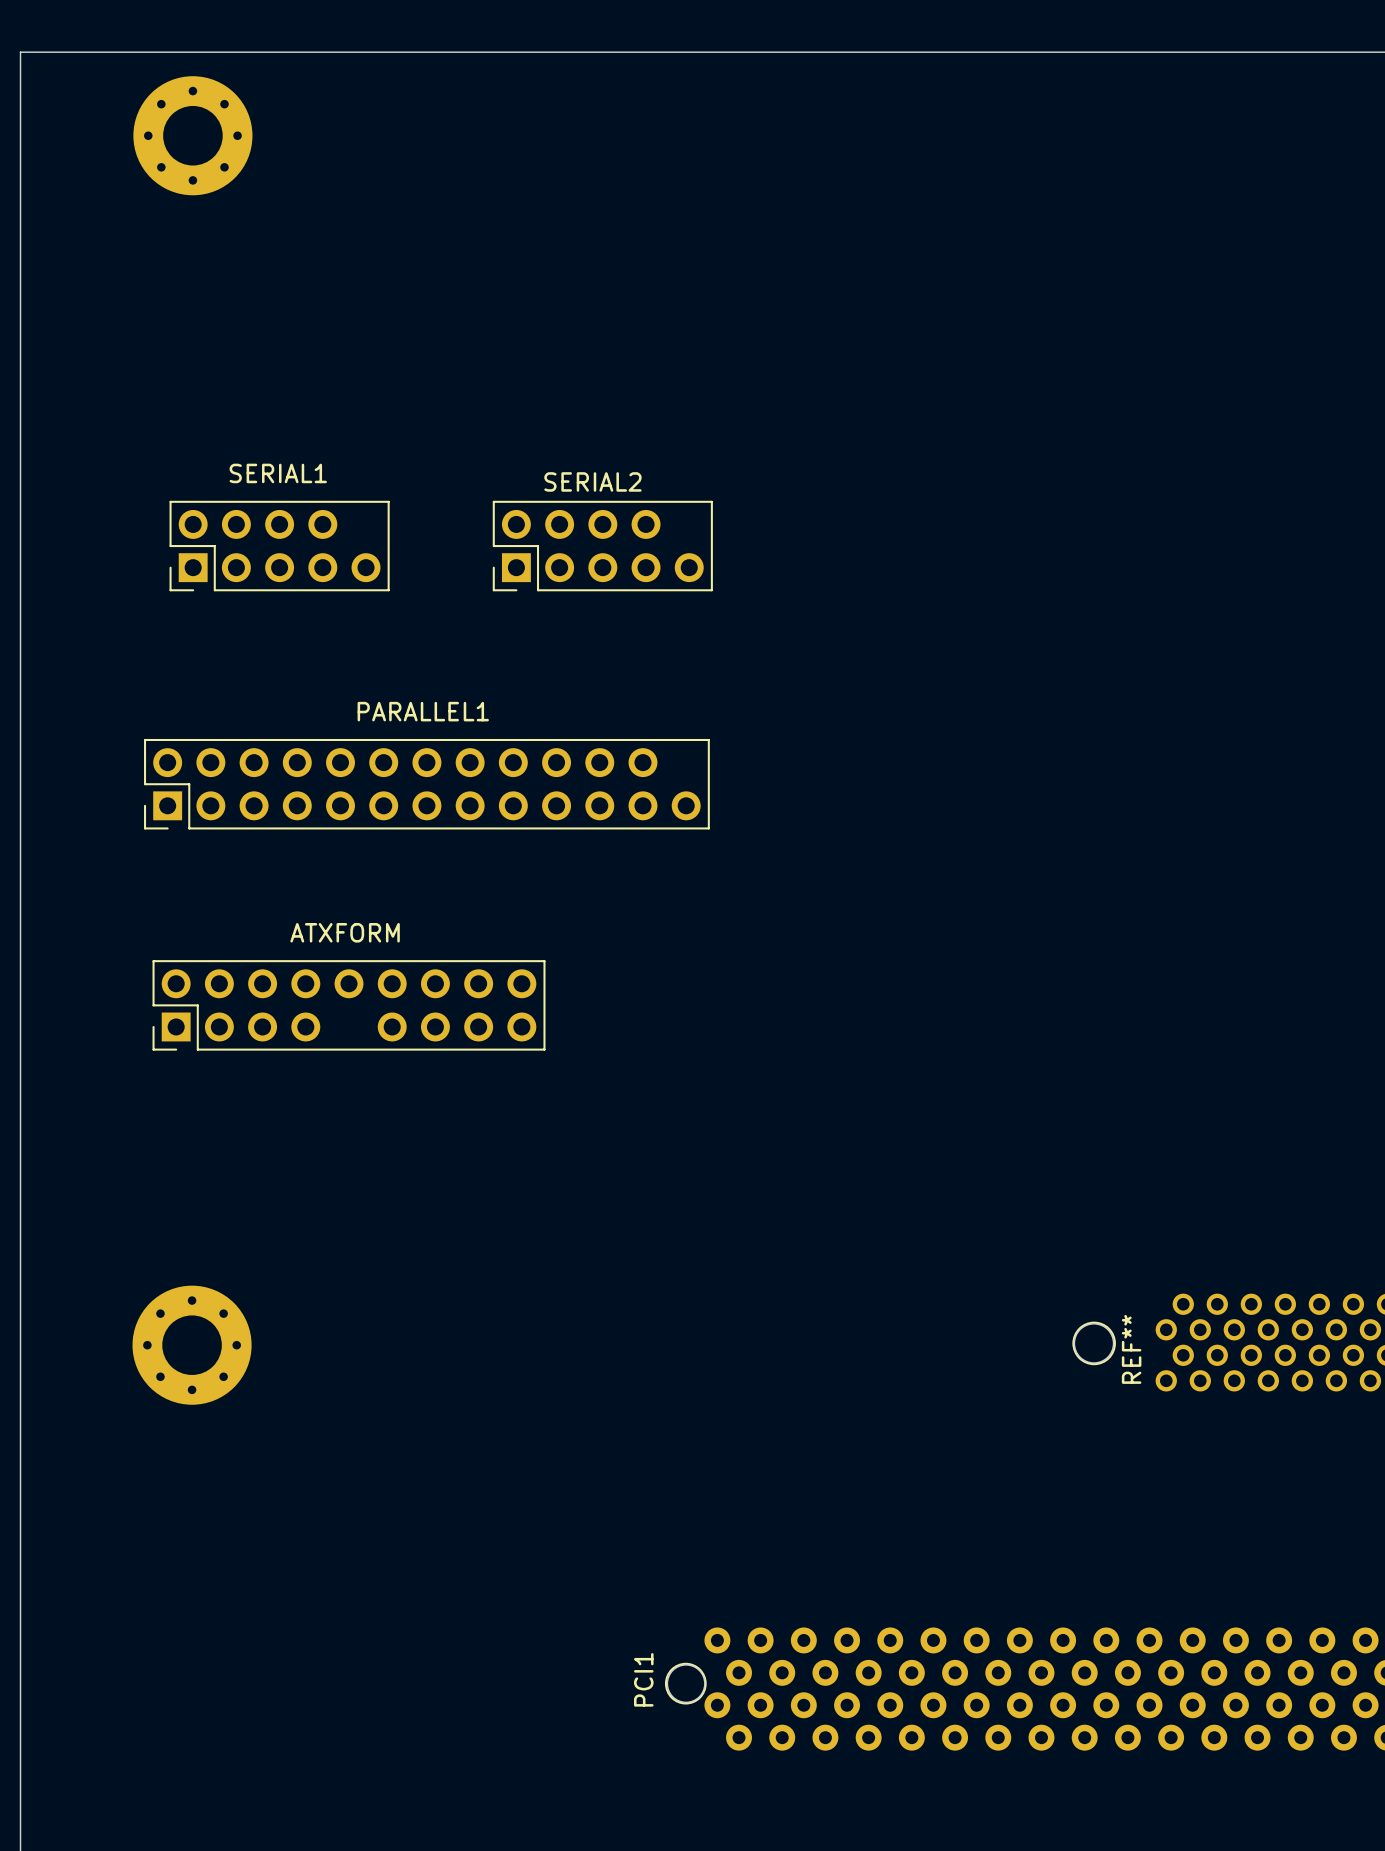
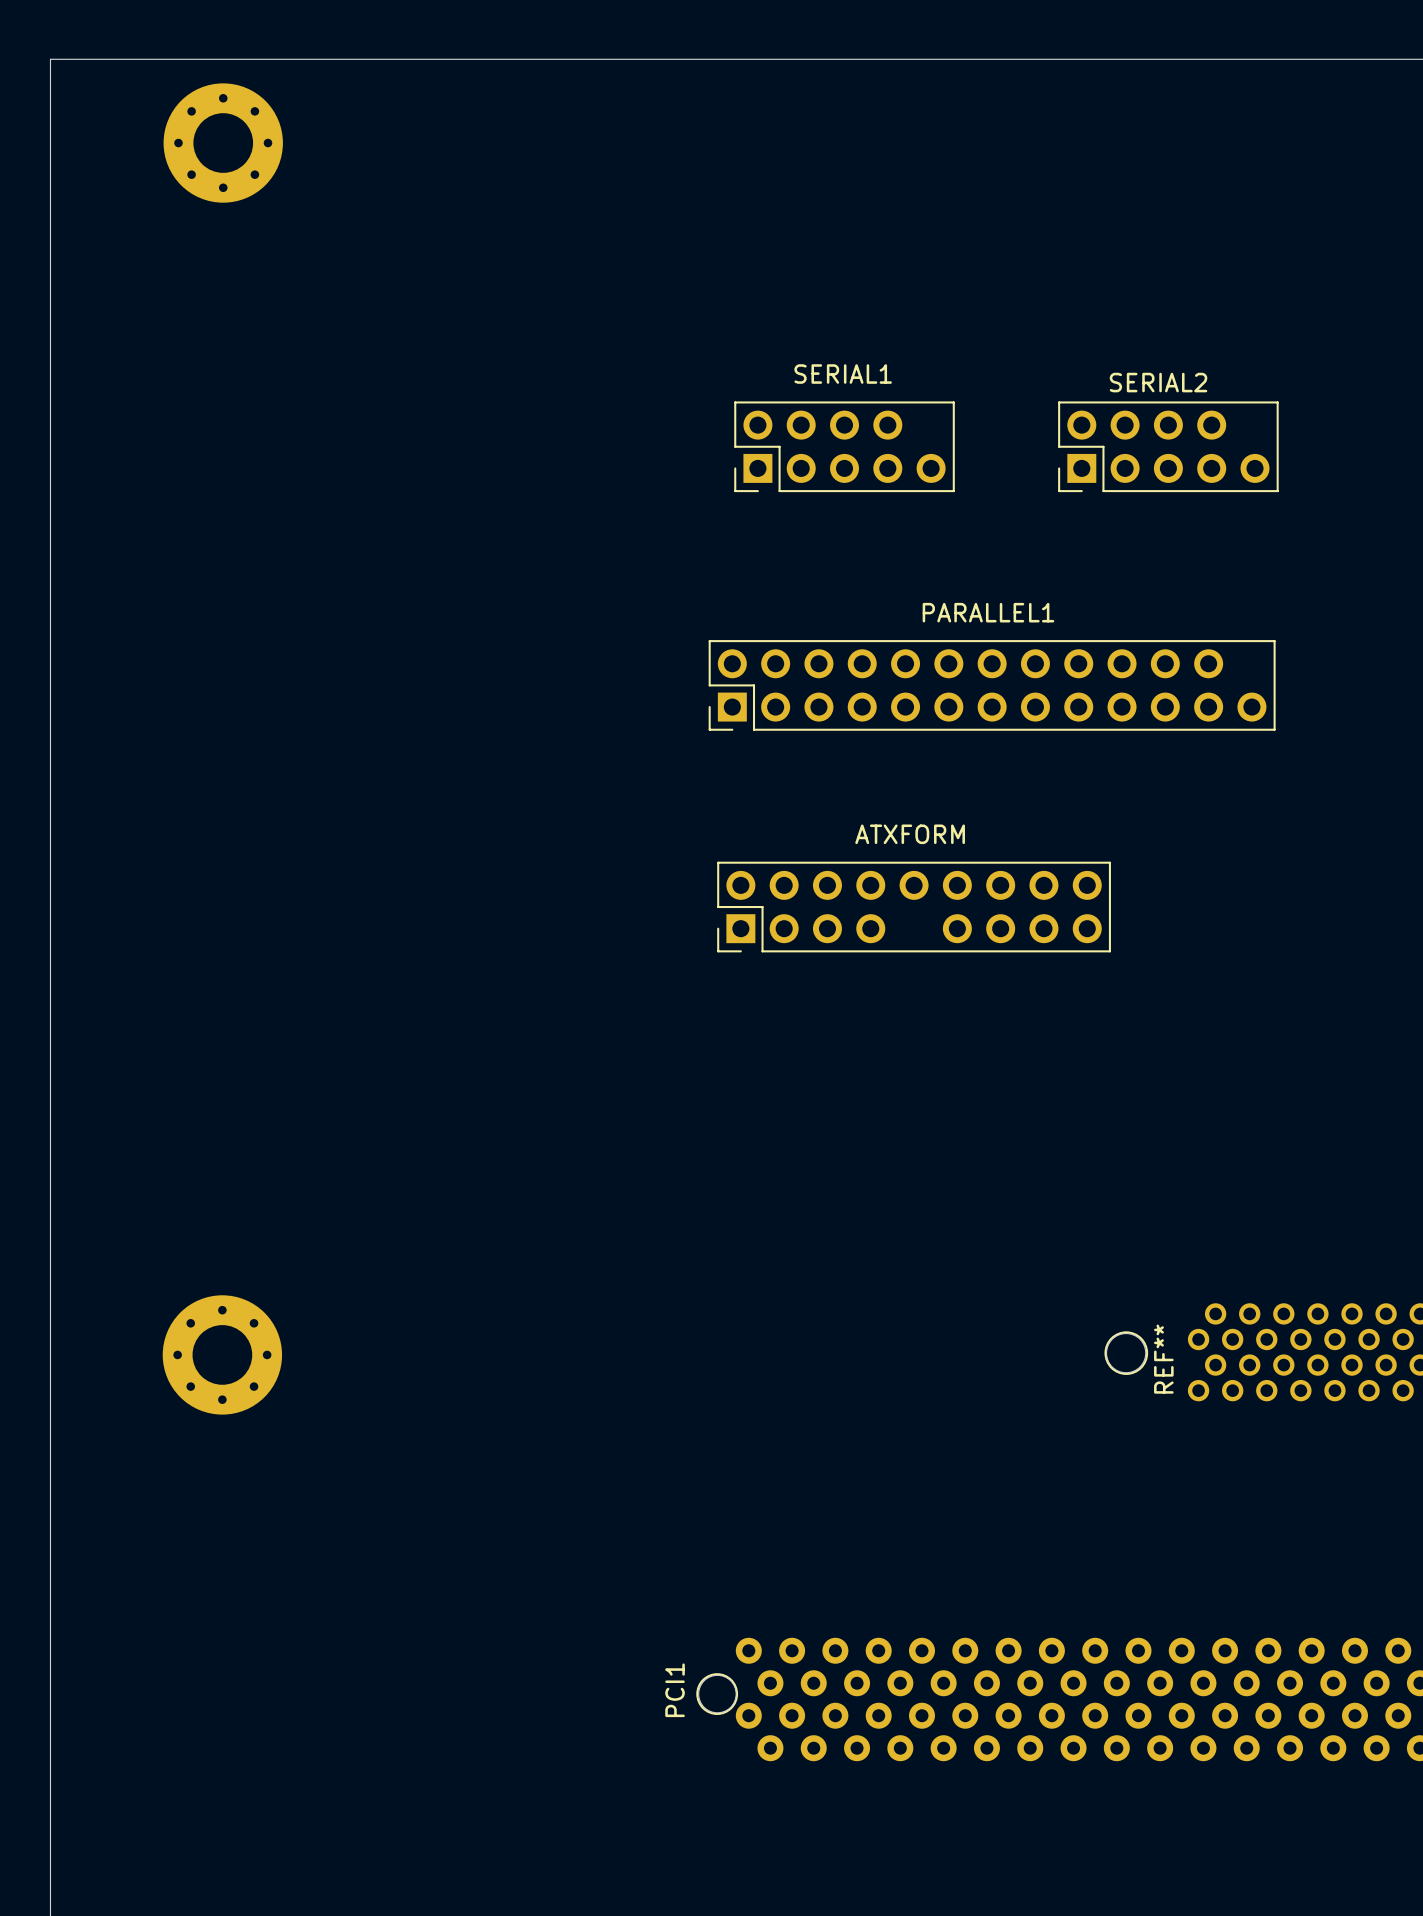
SERIAL1 position: (279, 546) -> (844, 446)
SERIAL2 position: (602, 546) -> (1168, 446)
PARALLEL1 position: (426, 784) -> (992, 685)
ATXFORM: none -> (914, 907)
ATXFORM: (349, 1005) -> none

